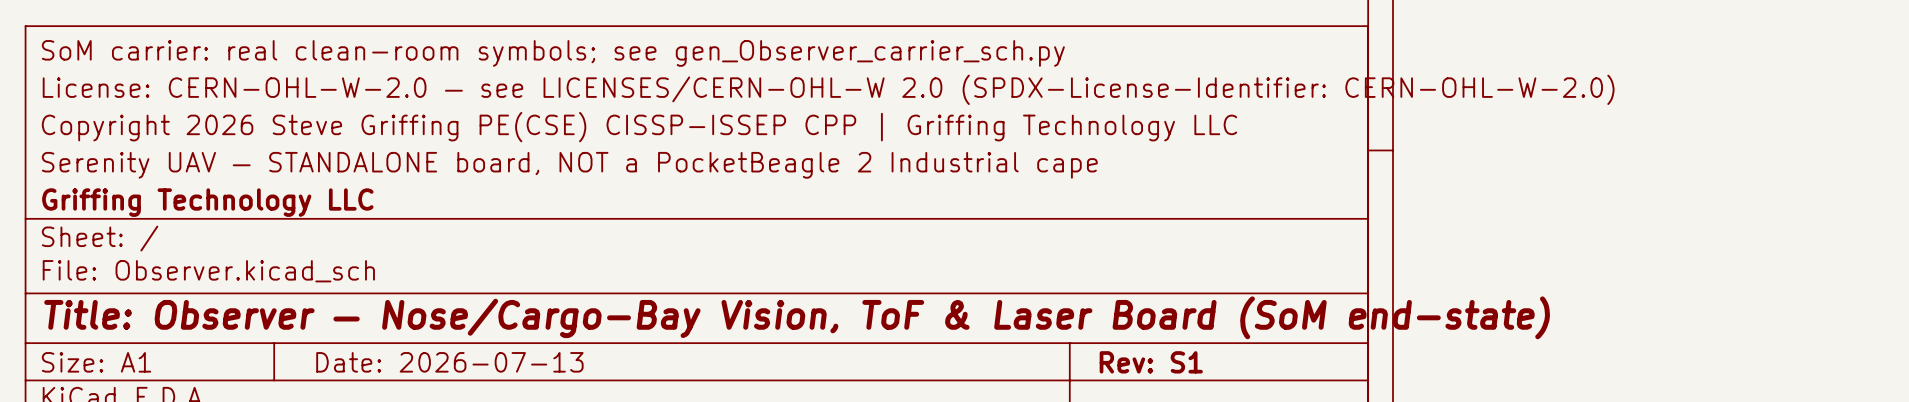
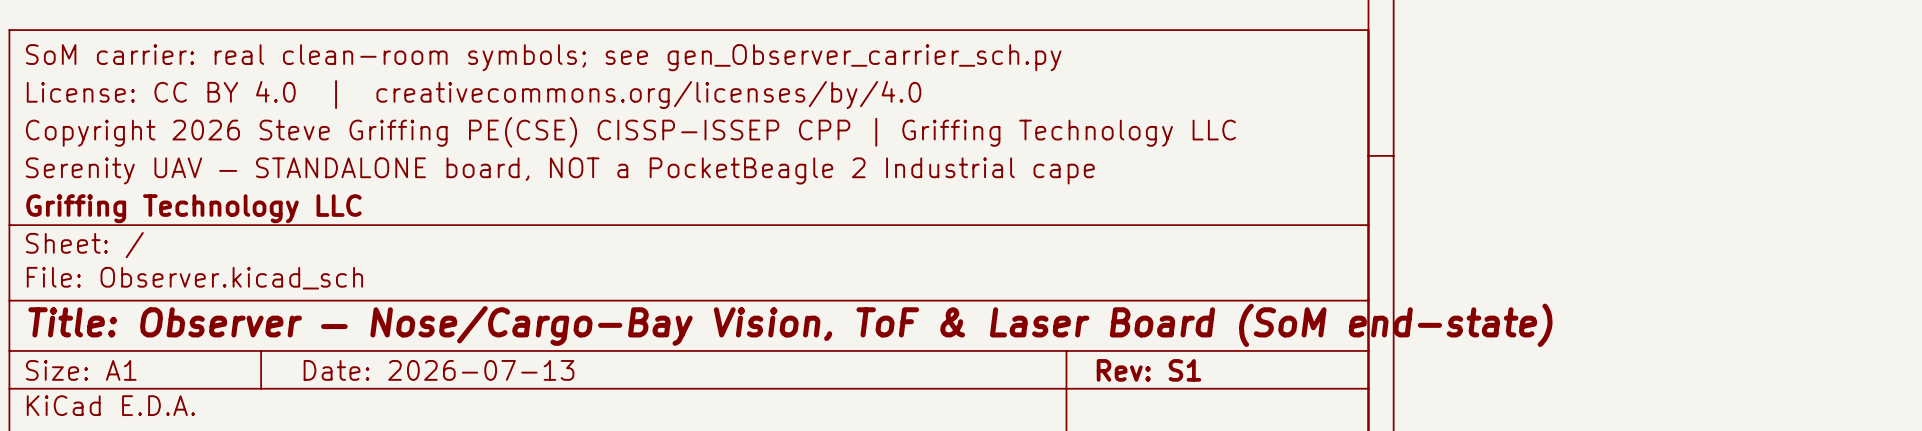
title block: License: CERN-OHL-W-2.0 — see LICENSES/CERN-OHL-W 2.0 (SPDX-License-Identifier: CERN-OHL-W-2.0) (828, 89) -> License: CC BY 4.0 | creativecommons.org/licenses/by/4.0 (474, 94)

